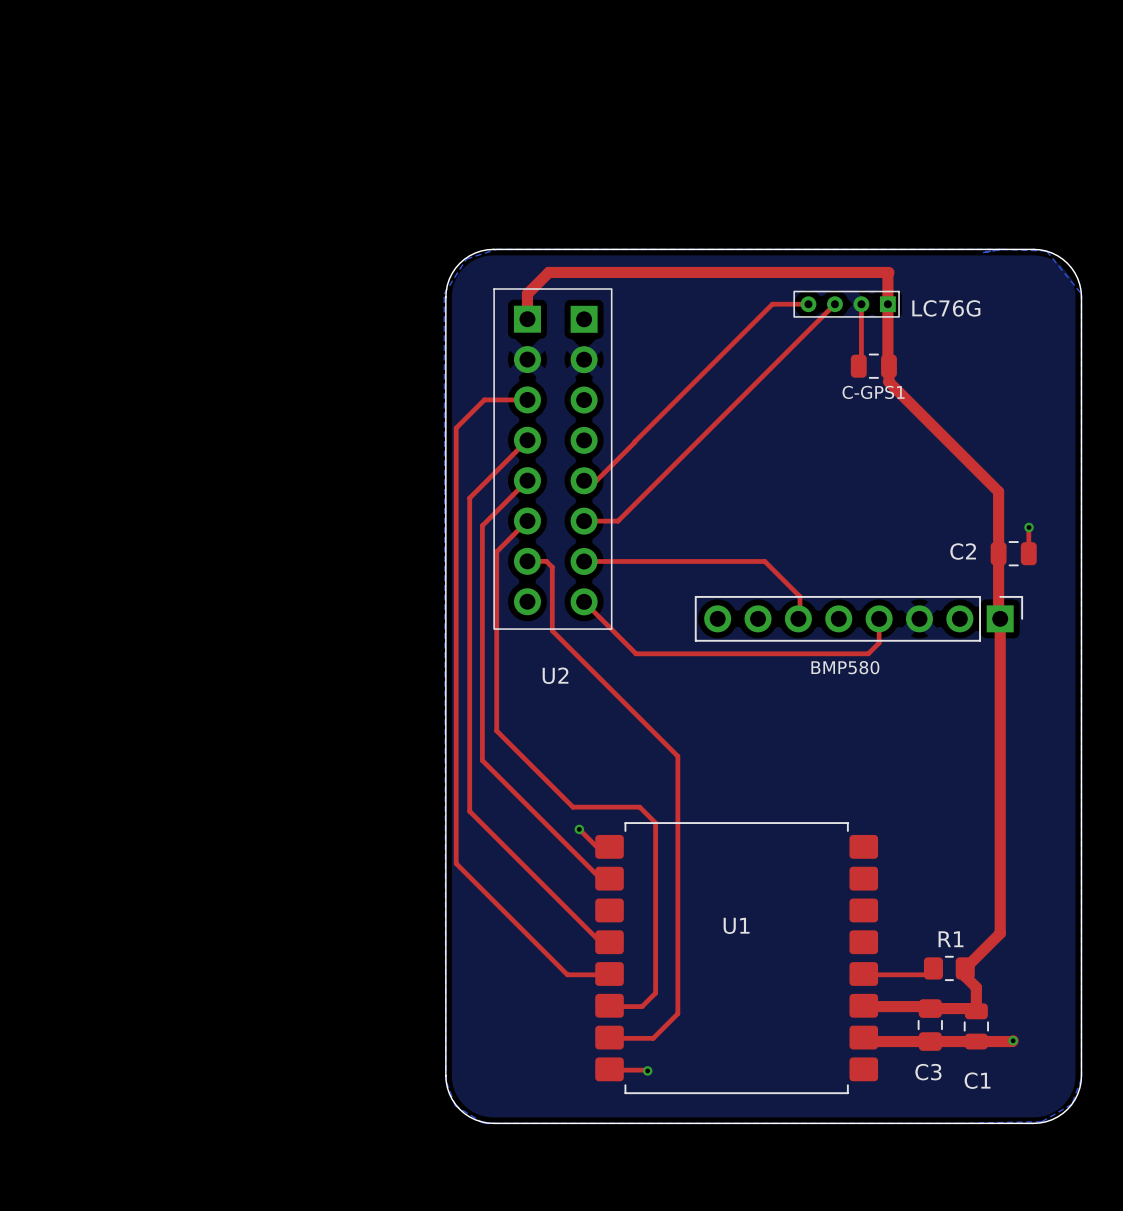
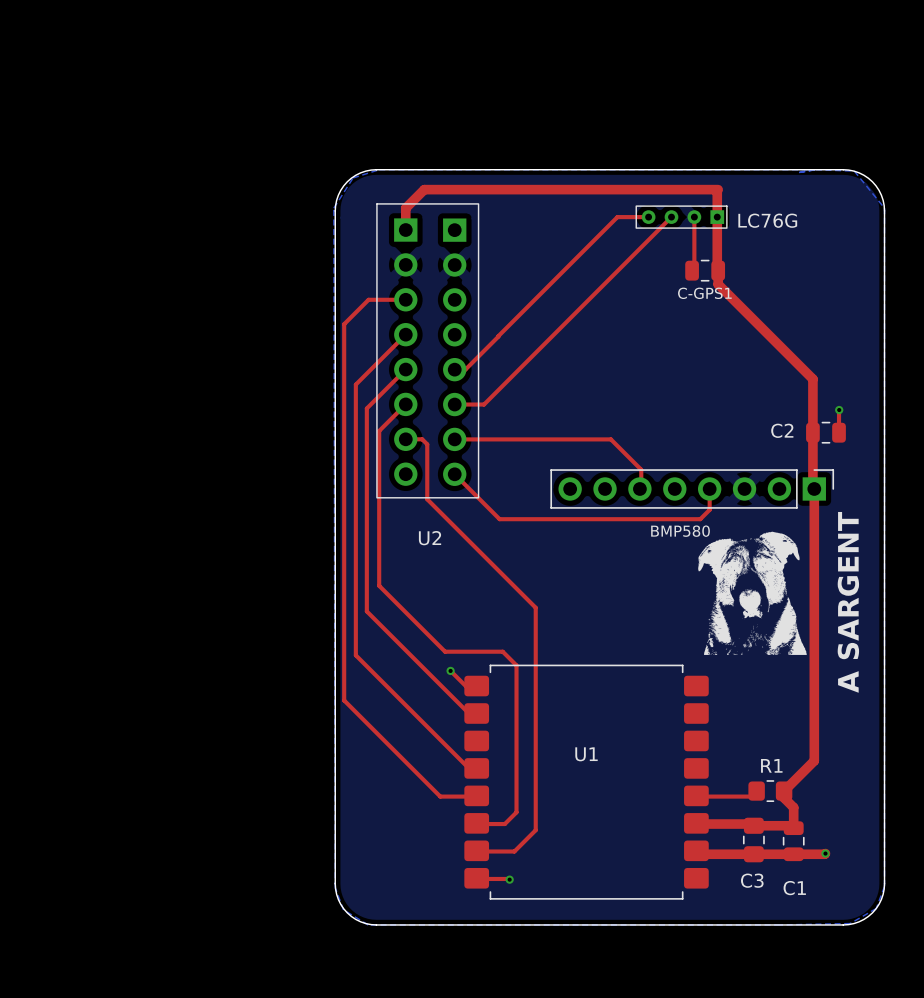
drawing: none -> [698, 531, 807, 655]
text: none -> A SARGENT (848, 602)

